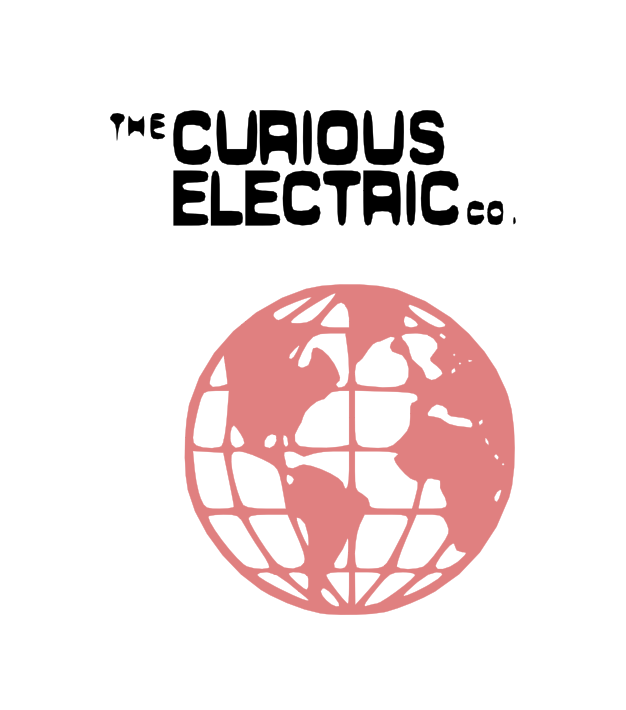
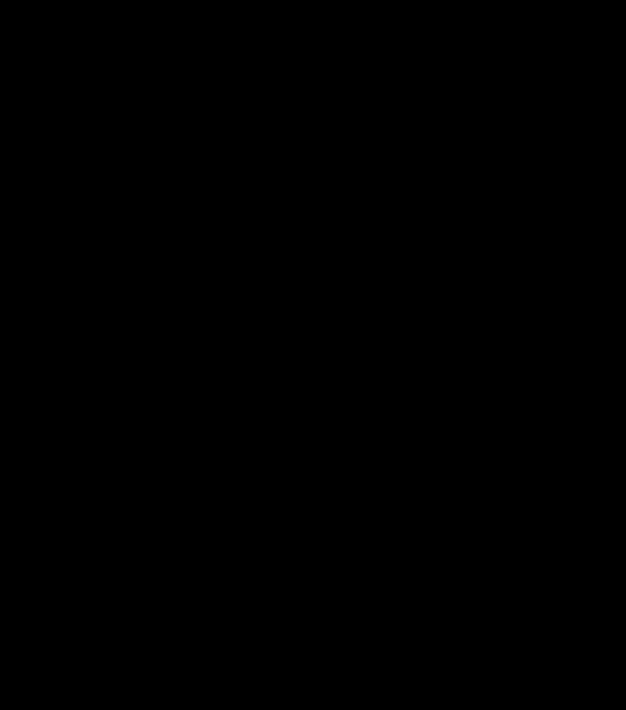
drawing: [110, 110, 516, 226] -> none
part: (349, 449) -> none

